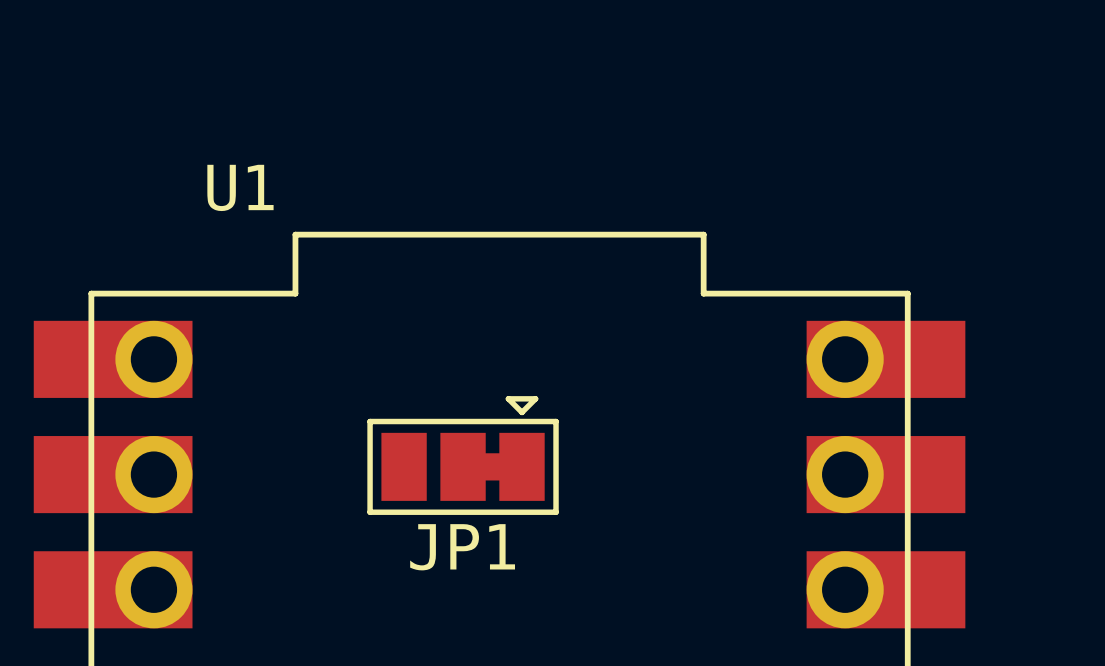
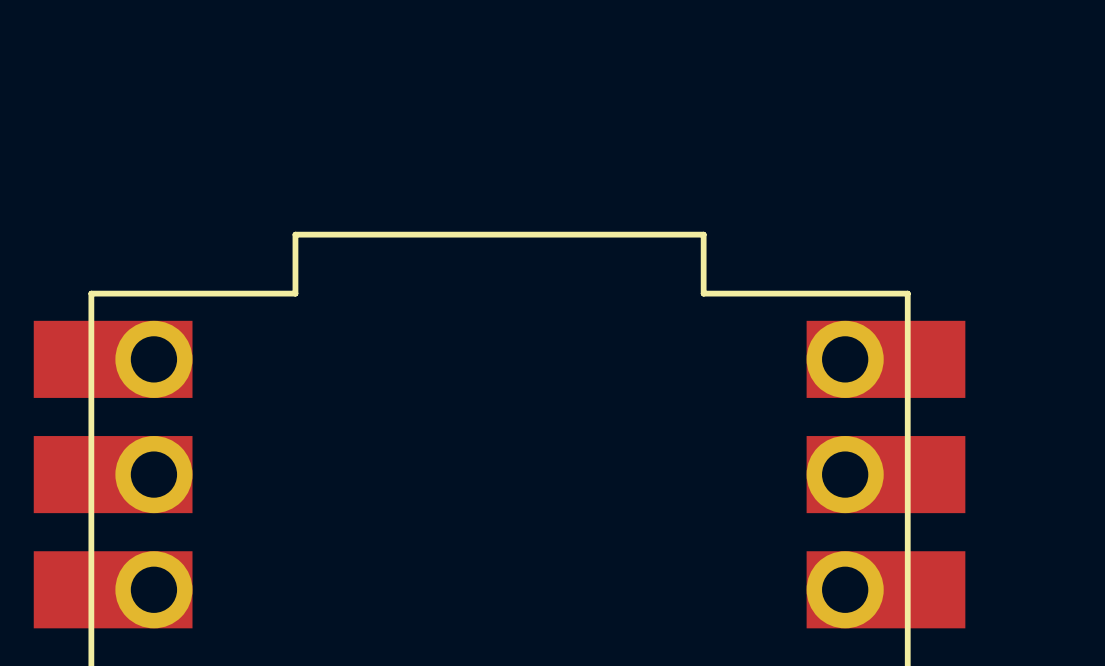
U1 name: U1 (240, 187) -> none
JP1: (463, 455) -> none

